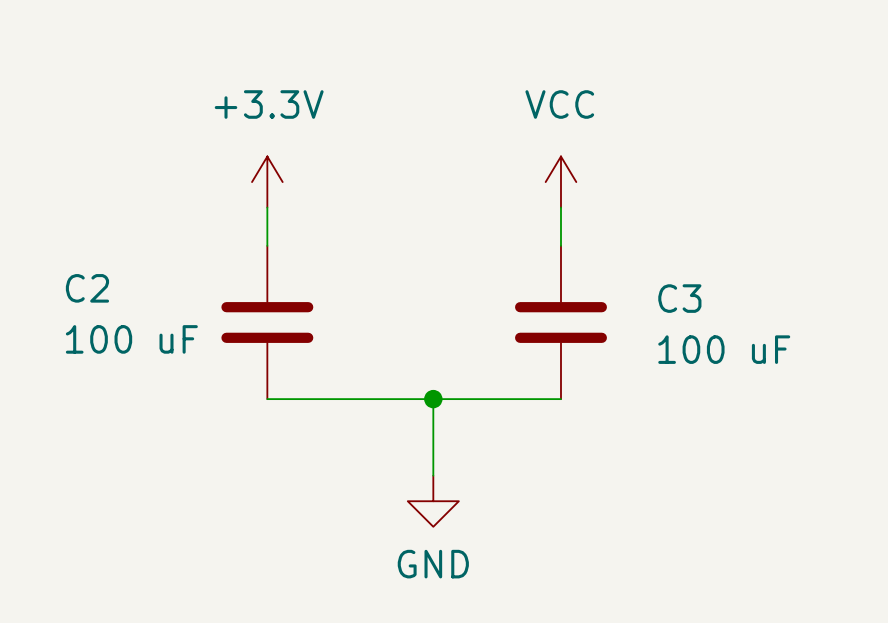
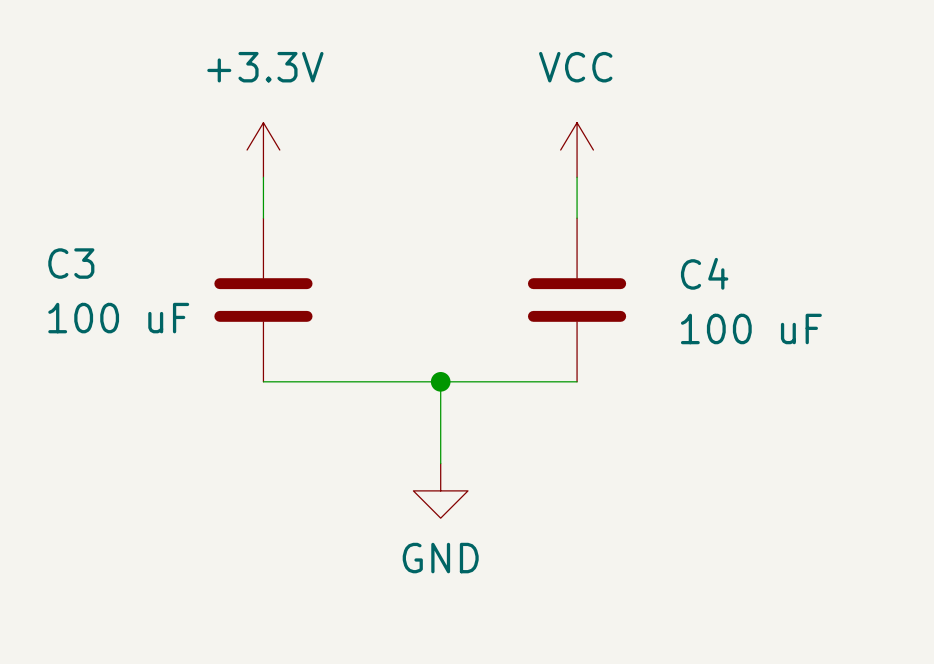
C2 name: C2 (87, 288) -> C3 (71, 263)
C3 name: C3 (679, 298) -> C4 (704, 273)

